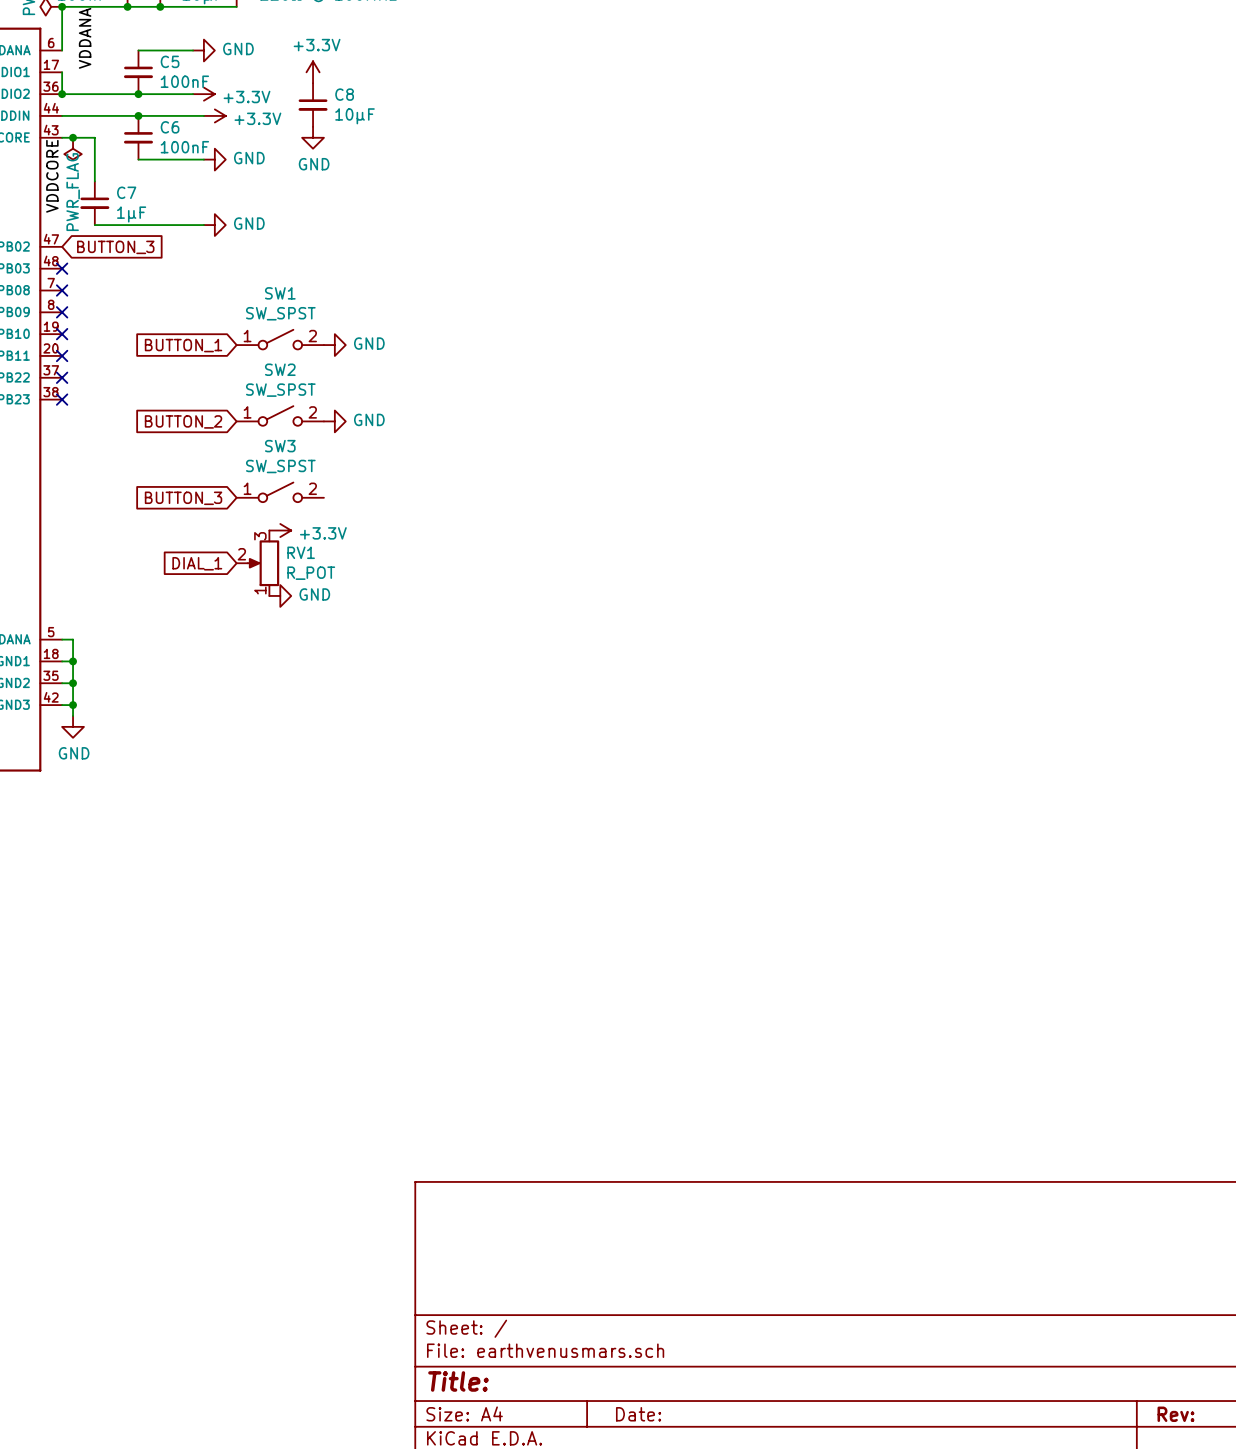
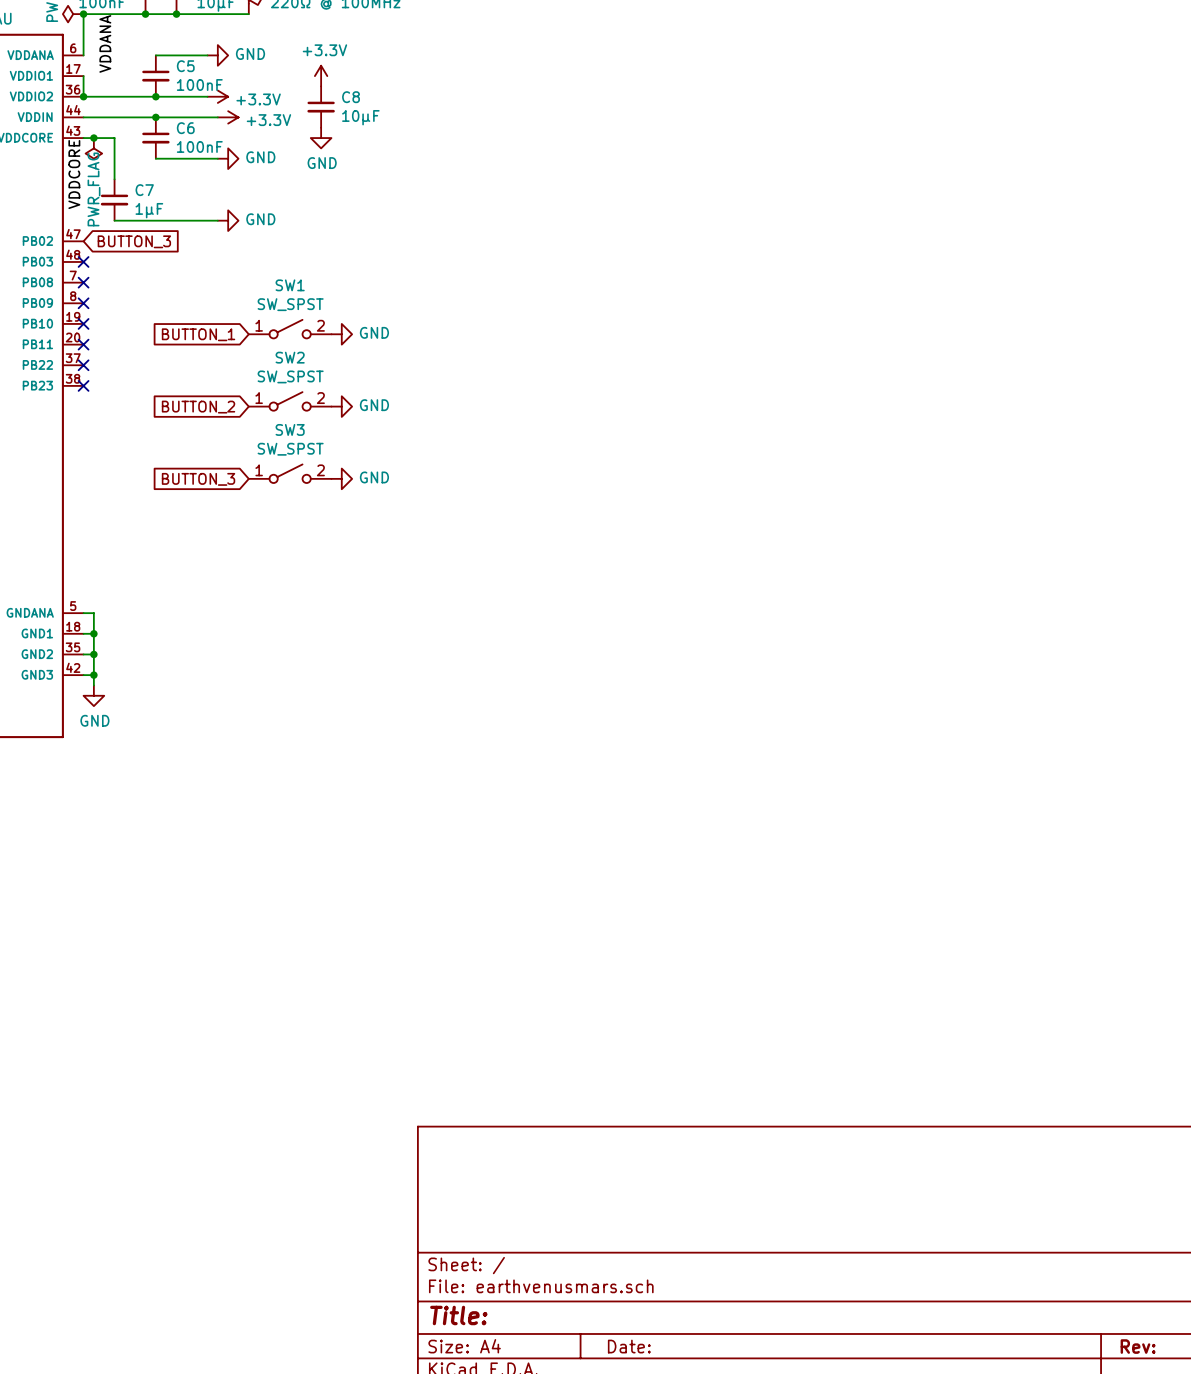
power symbol: +3.3V (280, 530) -> none
global label: DIAL_1 (197, 563) -> none
RV1: R_POT (257, 563) -> none
power symbol position: GND (280, 595) -> GND (341, 478)

